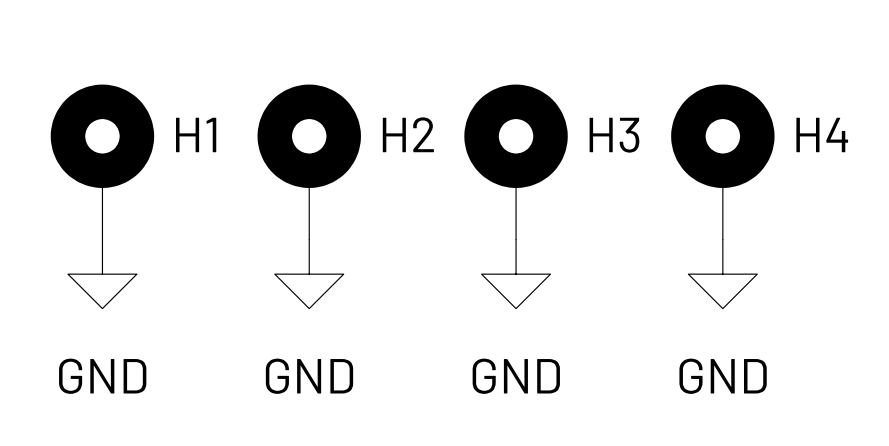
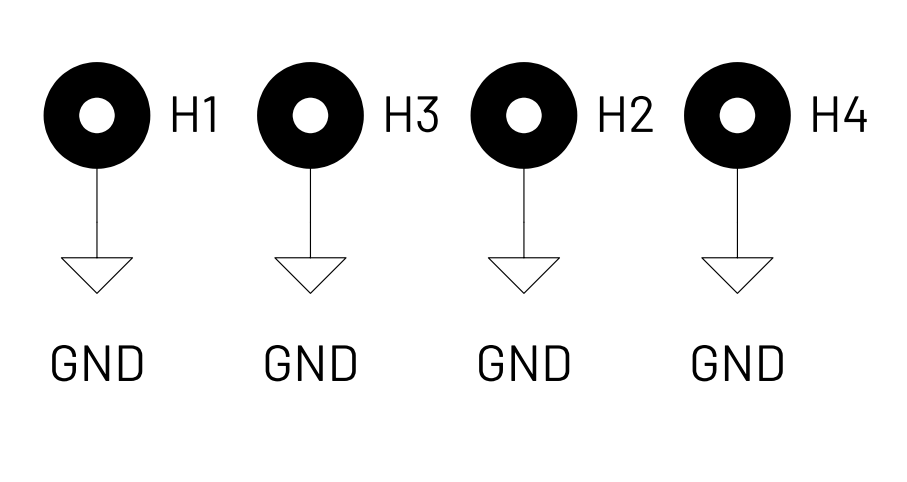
H2 name: H2 (408, 134) -> H3 (412, 114)
H3 name: H3 (614, 135) -> H2 (626, 113)

